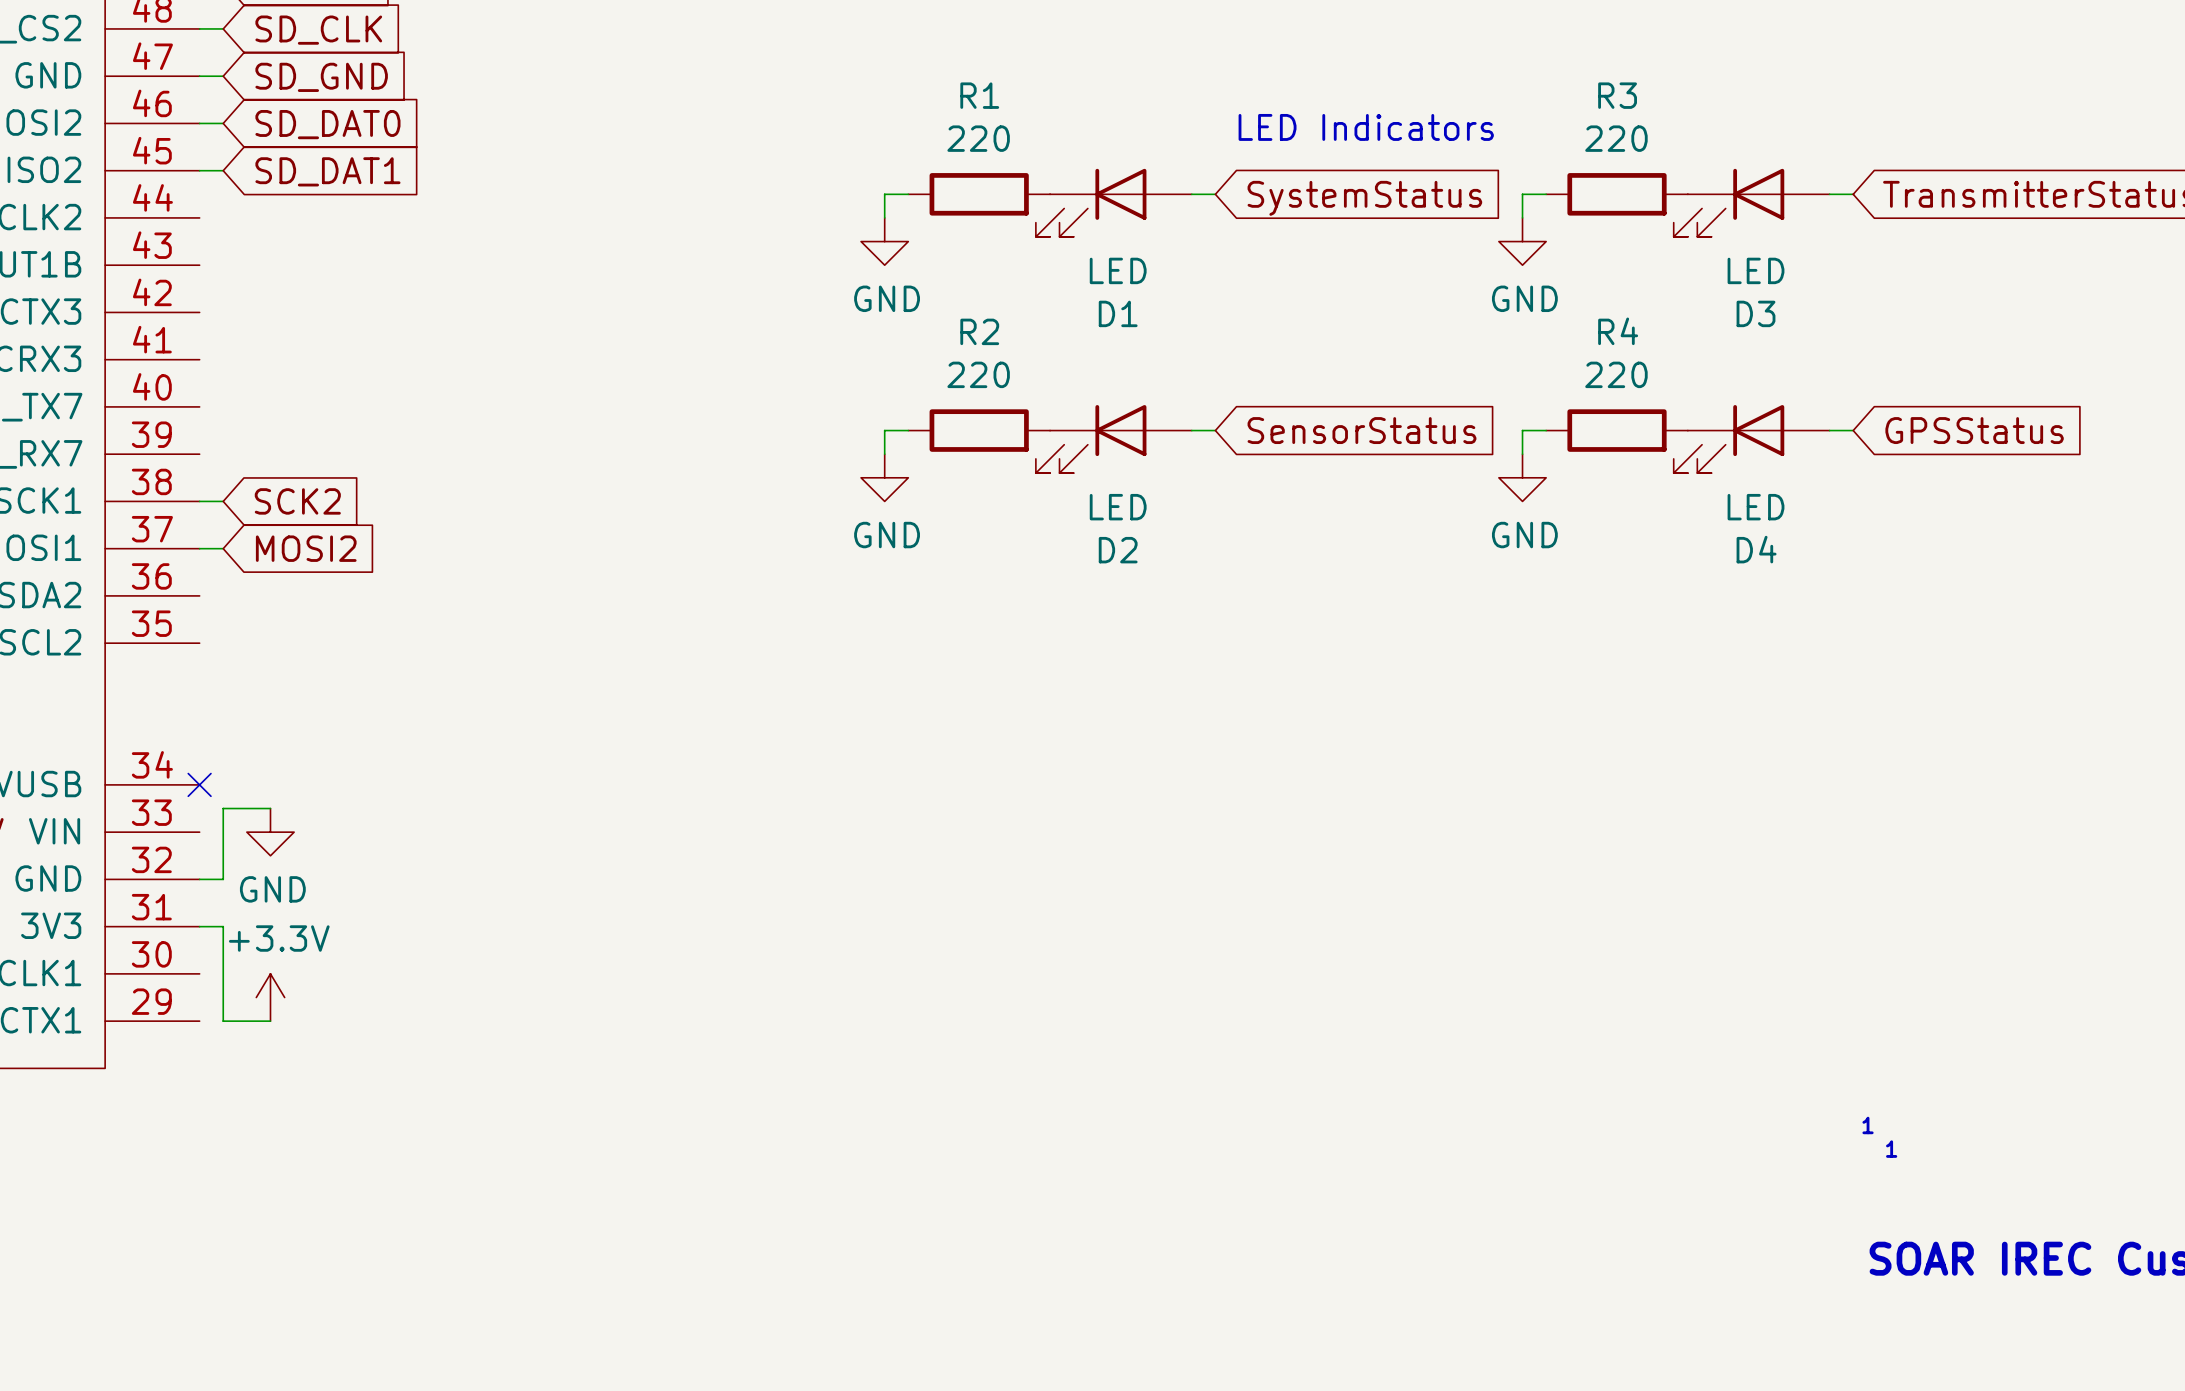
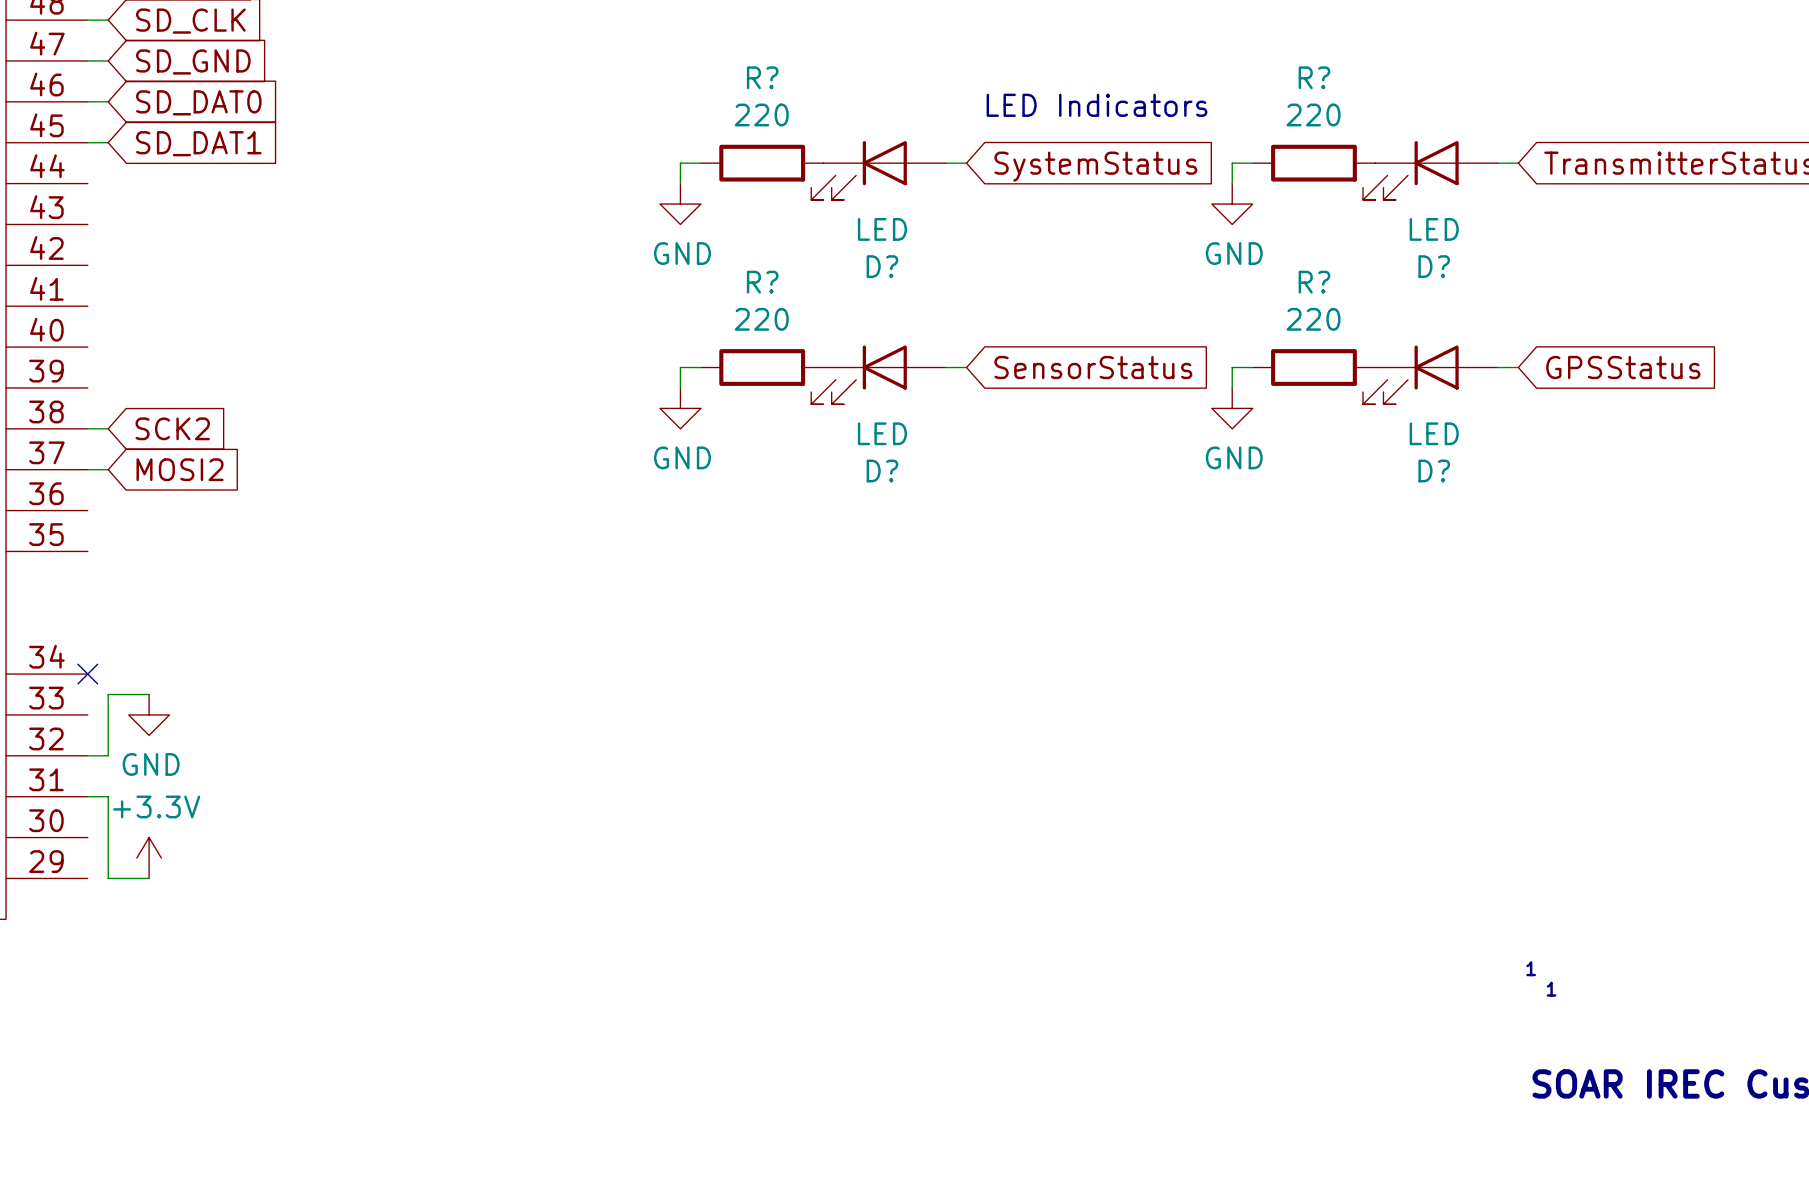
R1 name: R1 (979, 95) -> R? (762, 77)
R3 name: R3 (1617, 95) -> R? (1314, 77)
D1 name: D1 (1118, 313) -> D? (882, 266)
D3 name: D3 (1756, 313) -> D? (1434, 266)
R2 name: R2 (979, 331) -> R? (762, 282)
R4 name: R4 (1618, 331) -> R? (1314, 282)
D4 name: D4 (1756, 549) -> D? (1434, 470)
D2 name: D2 (1118, 550) -> D? (882, 470)

